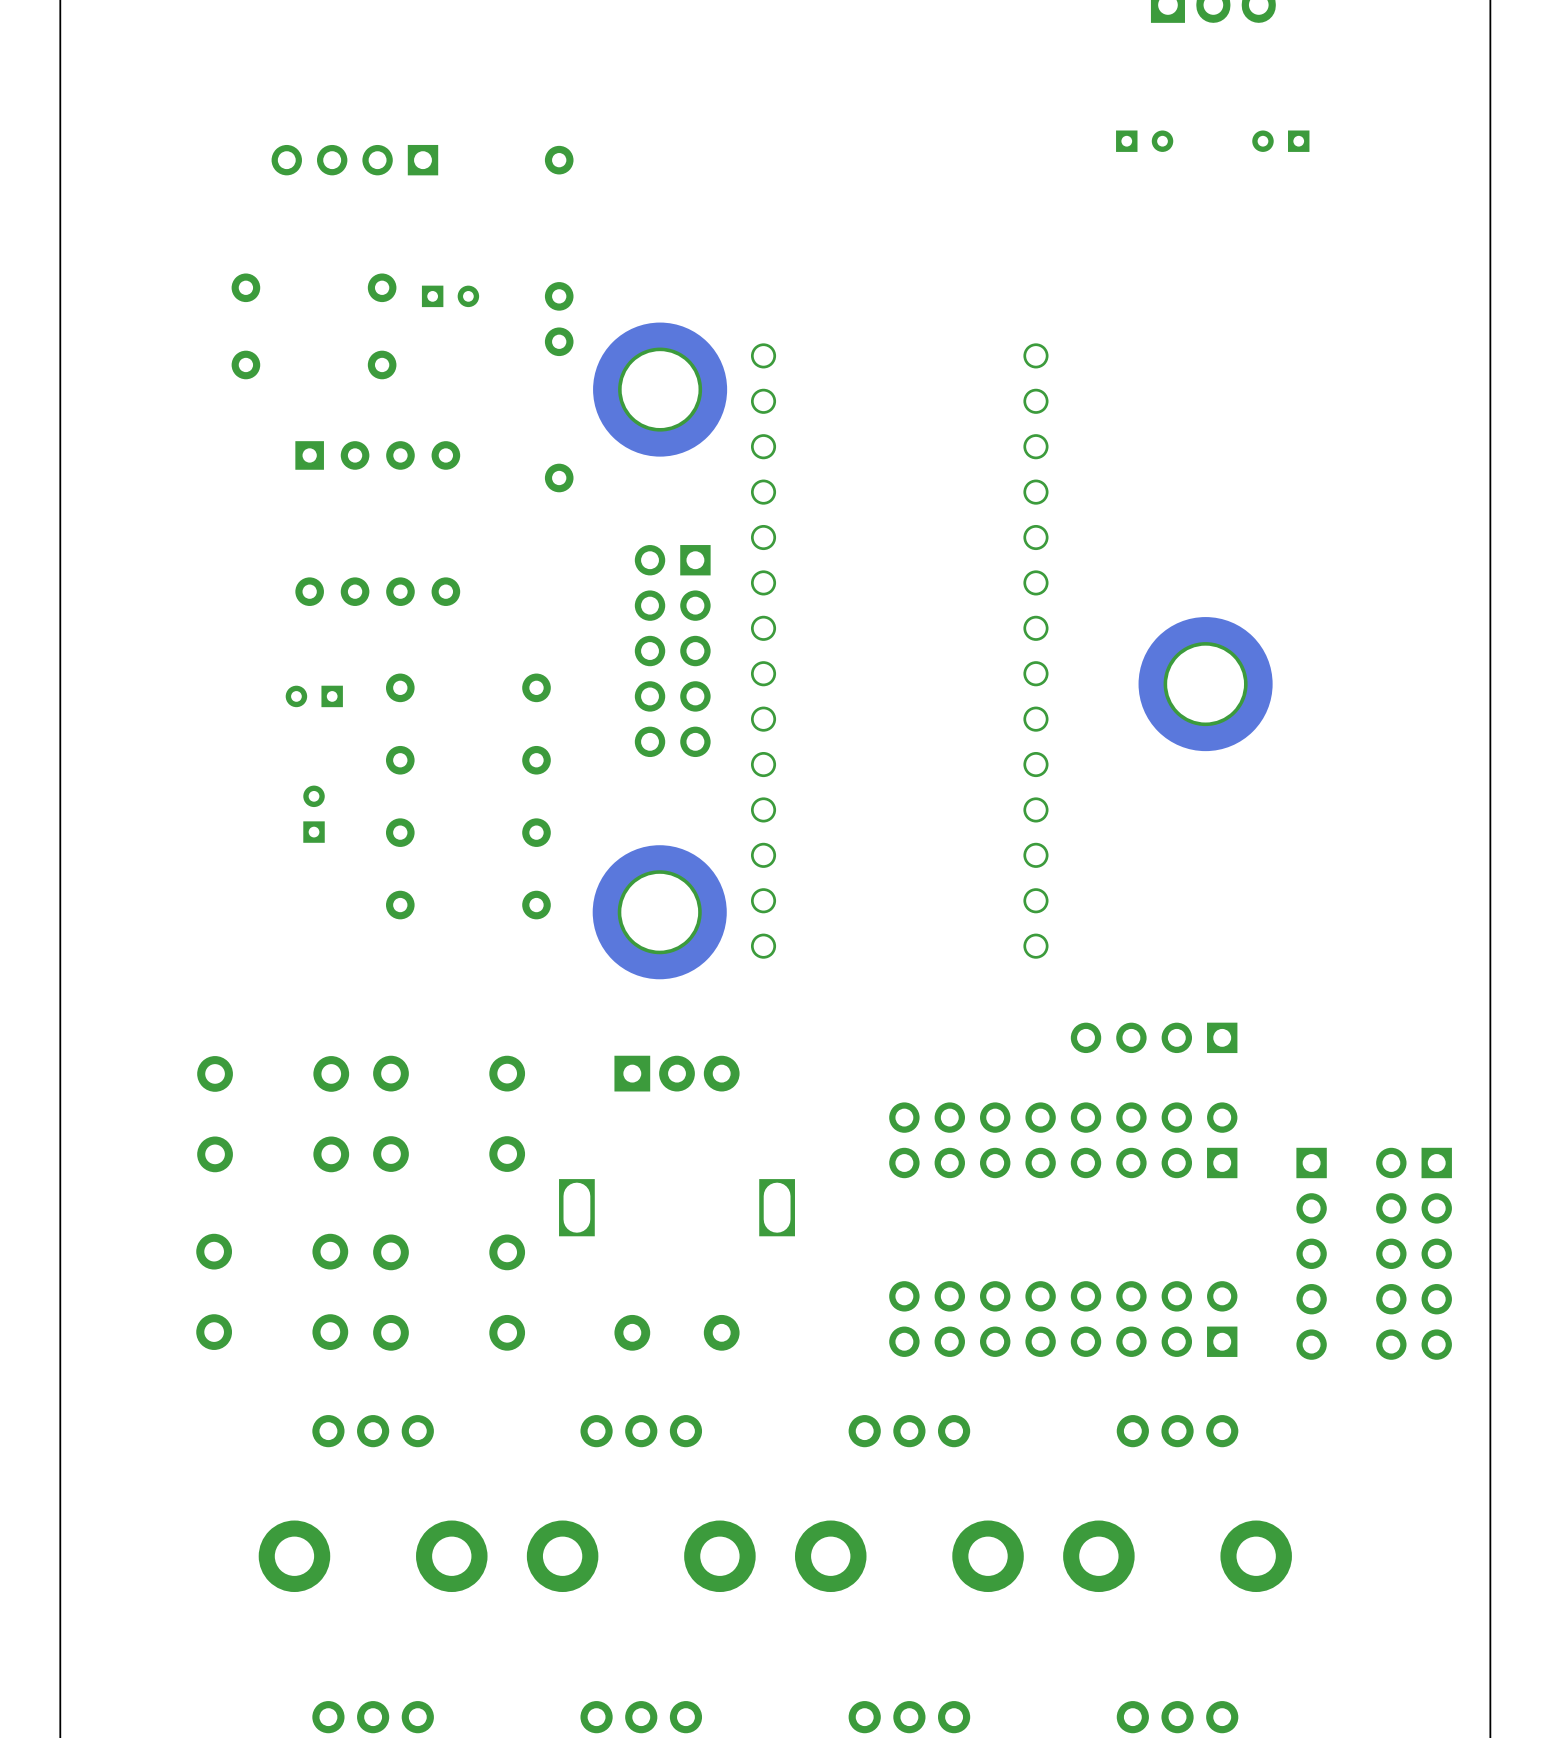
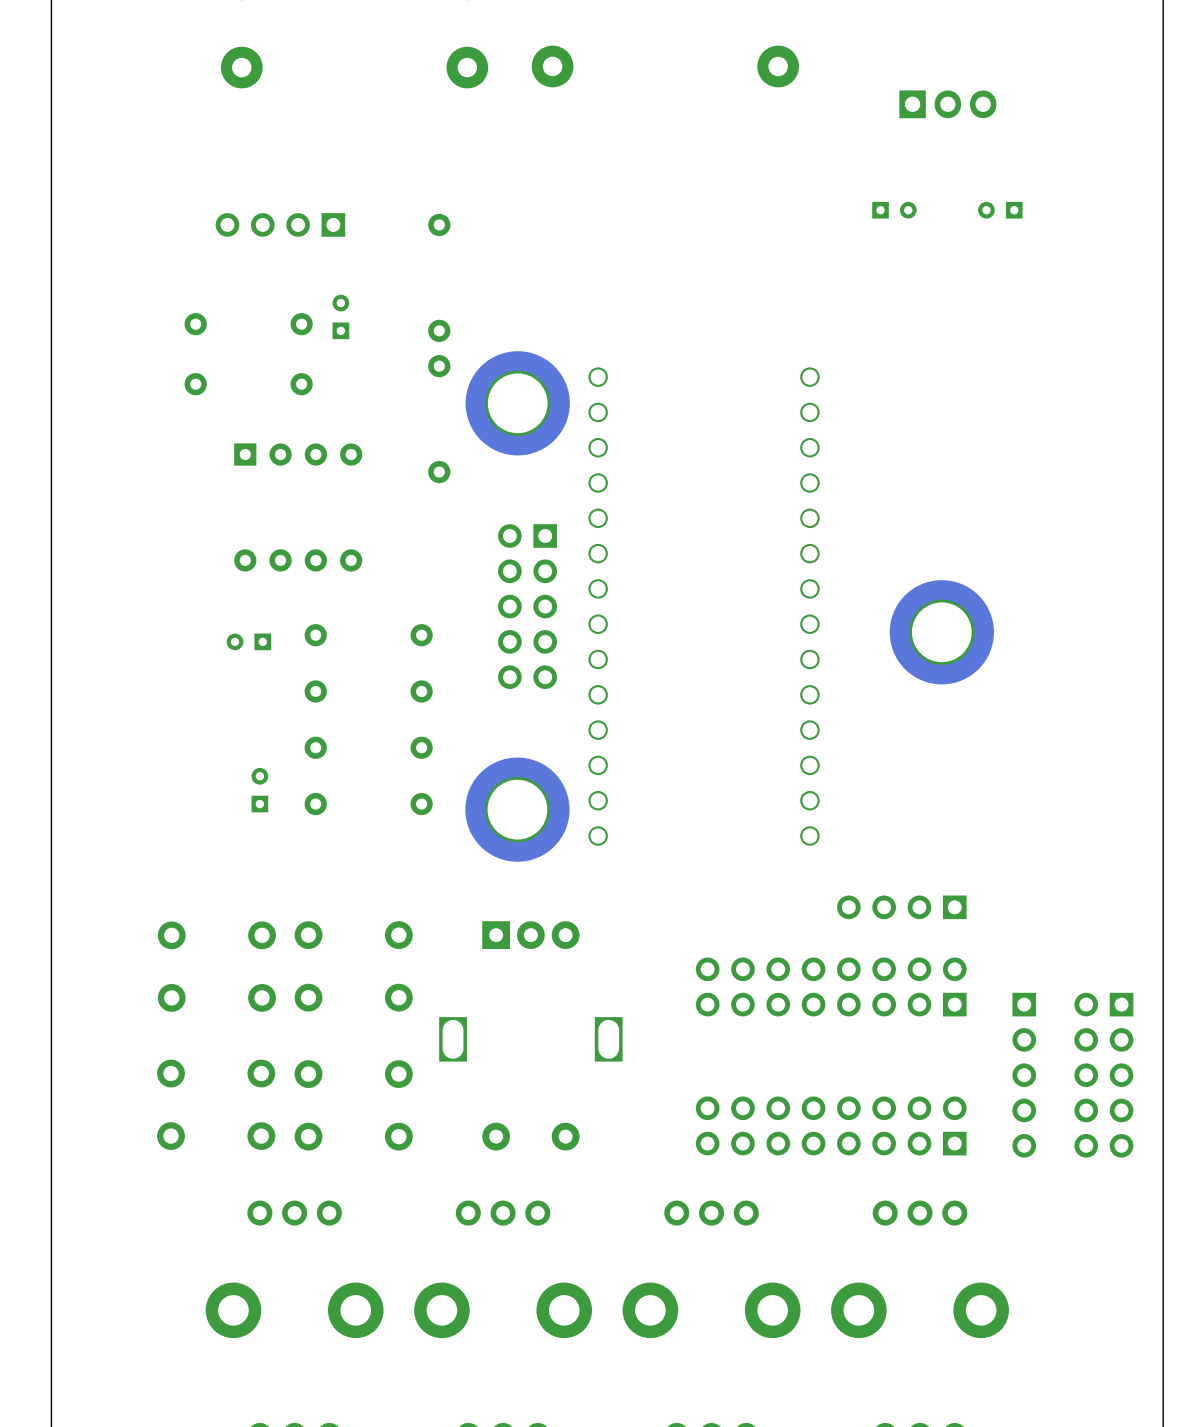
part rotation: 0° (450, 296) -> 90° counterclockwise (340, 316)
part position: (314, 814) -> (259, 790)

